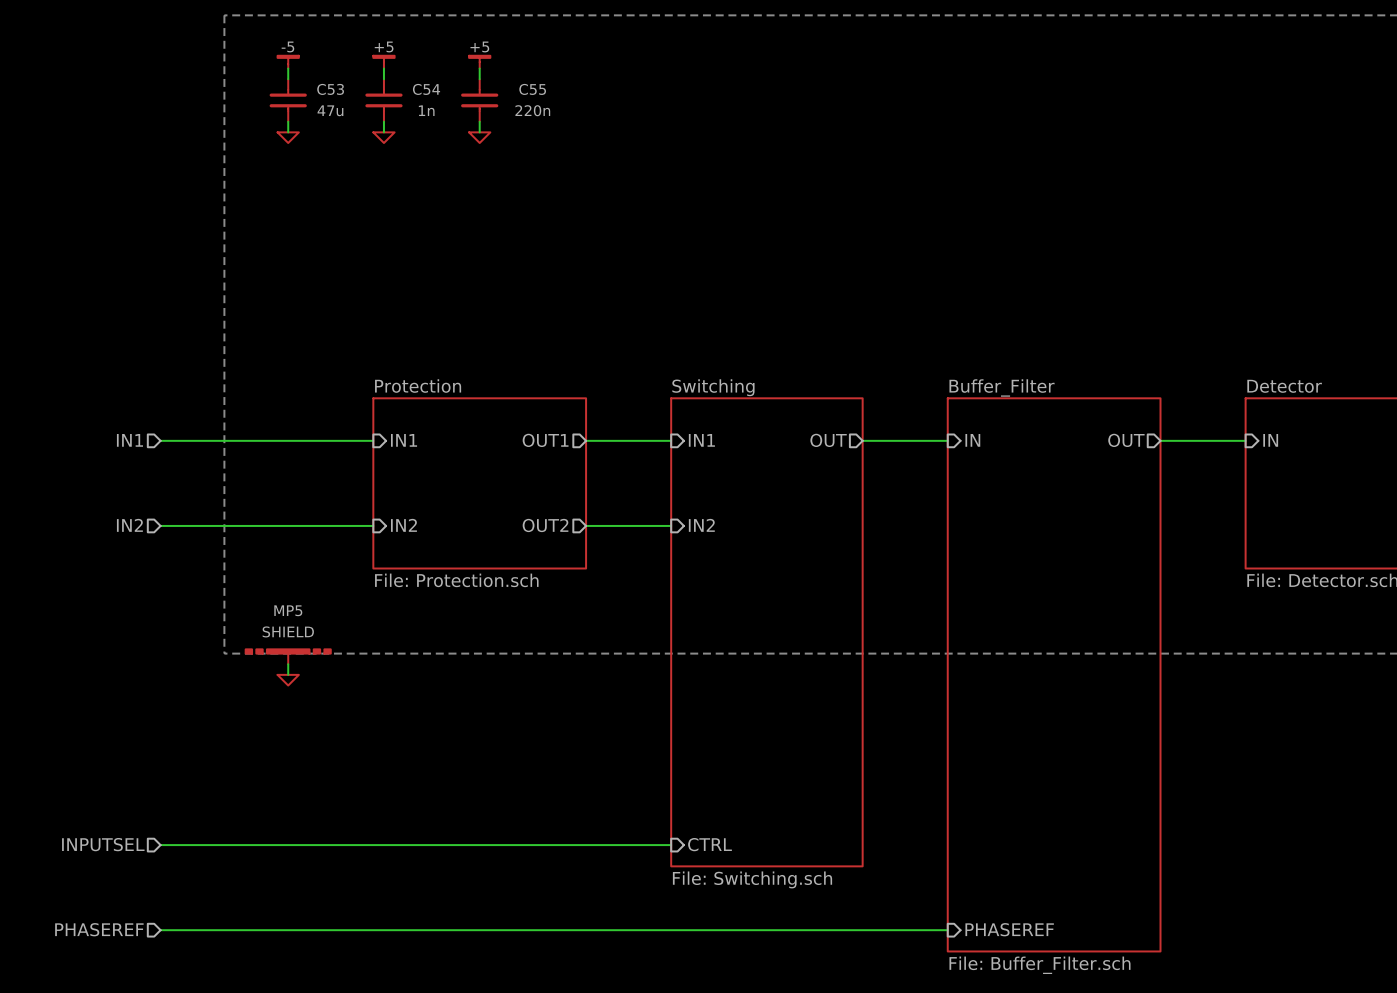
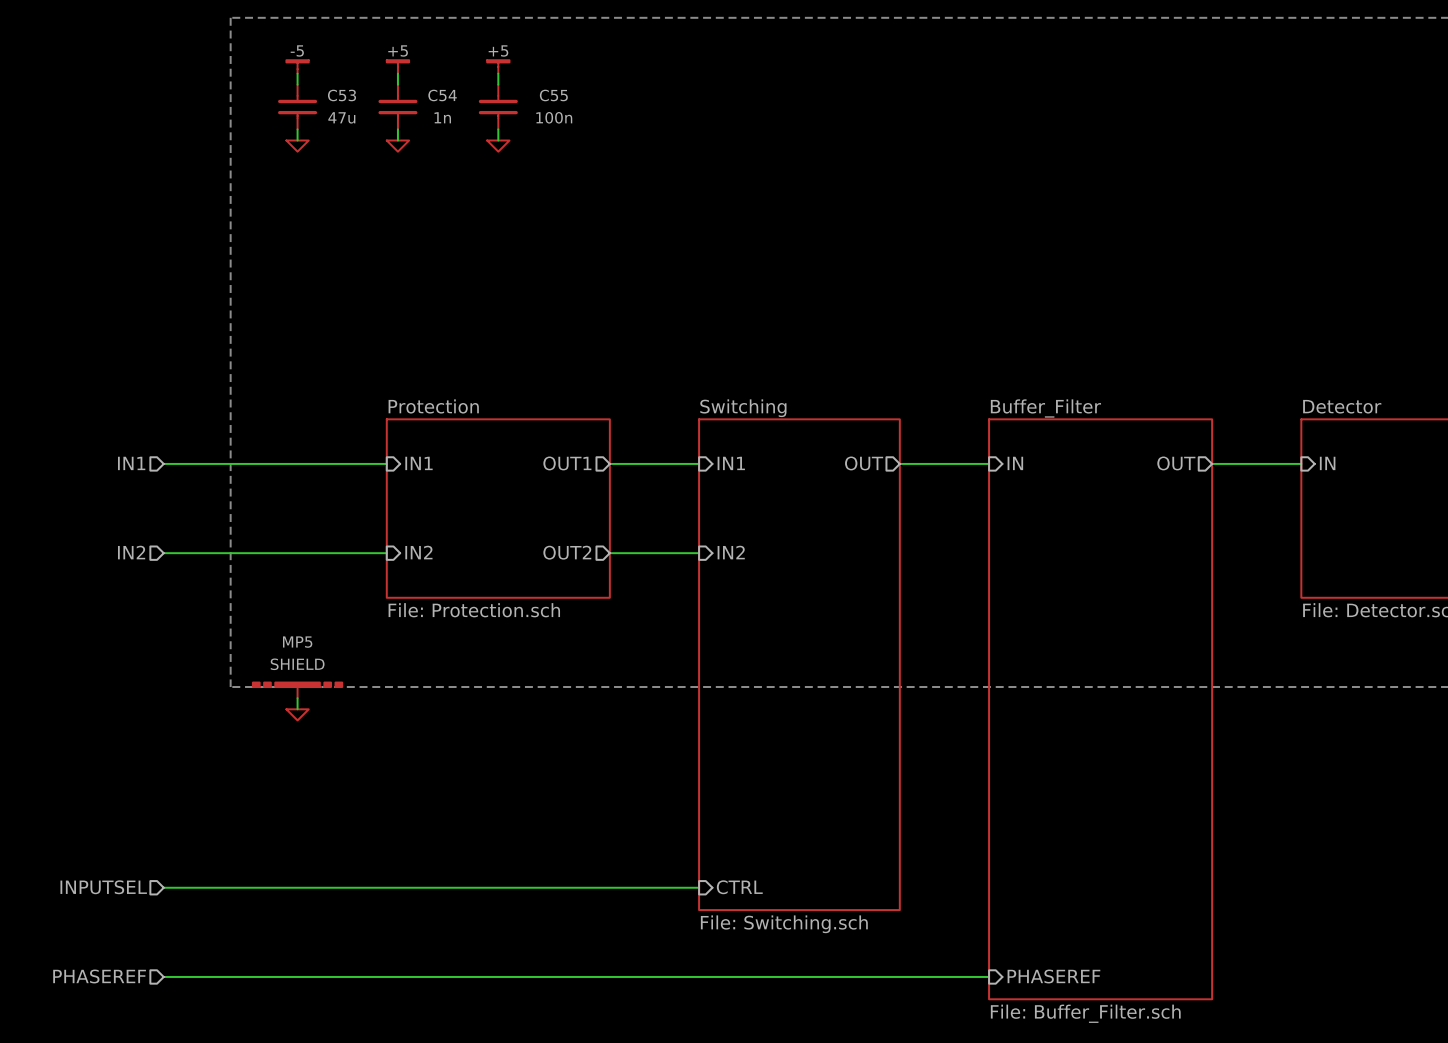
C55 value: 220n (532, 110) -> 100n (554, 117)

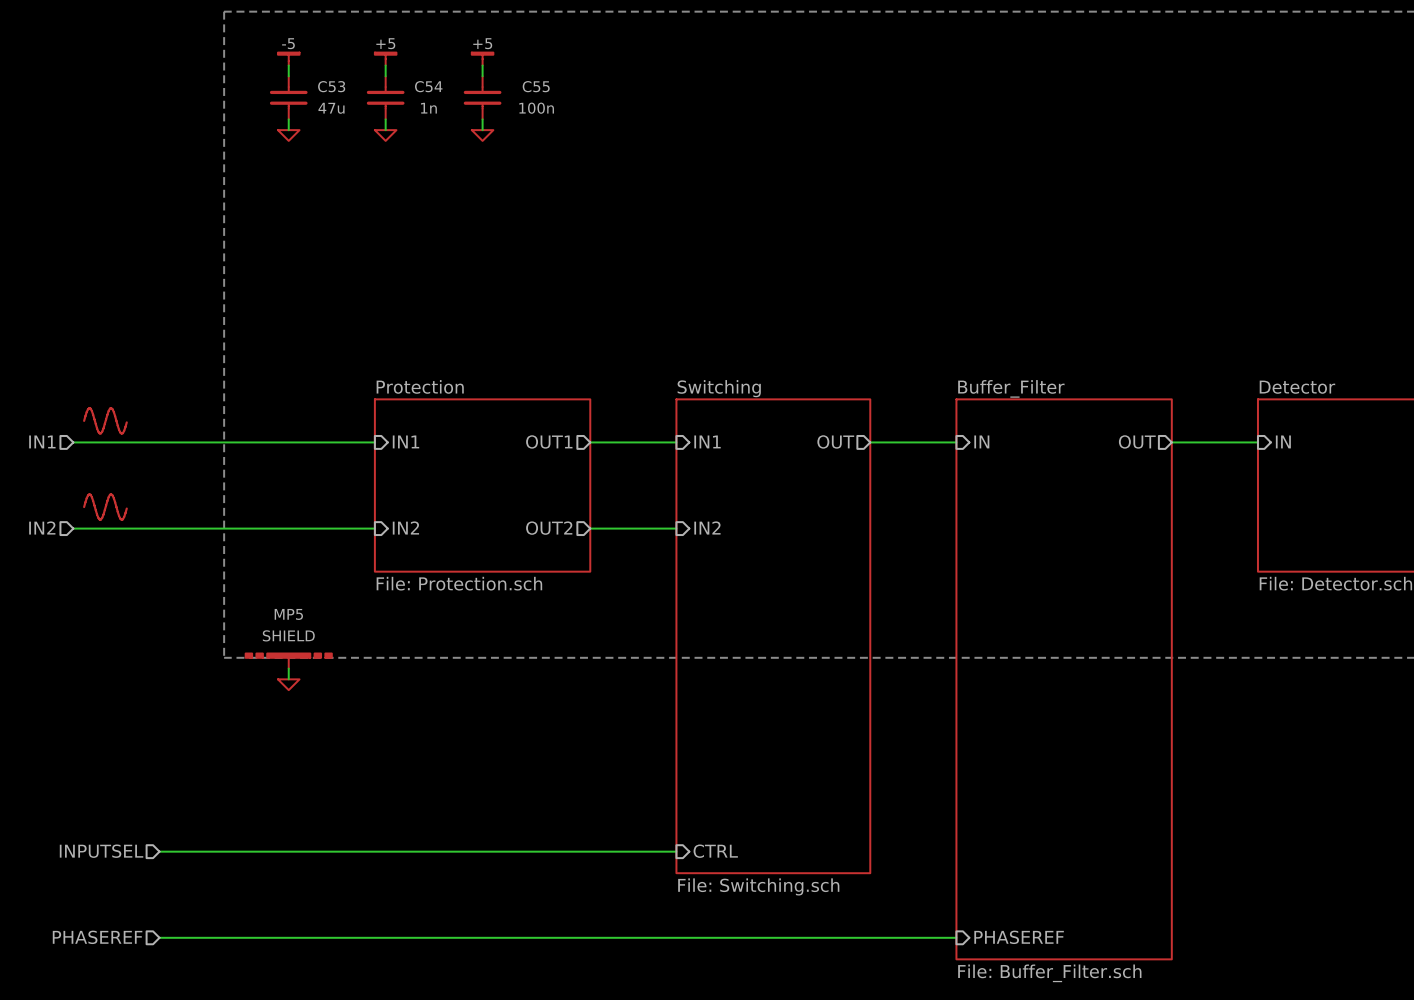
power symbol: none -> (105, 420)
wire: none -> (73, 442) (159, 442)
hierarchical label position: IN1 (131, 463) -> IN1 (42, 441)
power symbol: none -> (105, 507)
hierarchical label position: IN2 (131, 552) -> IN2 (42, 527)
wire: none -> (73, 528) (159, 528)

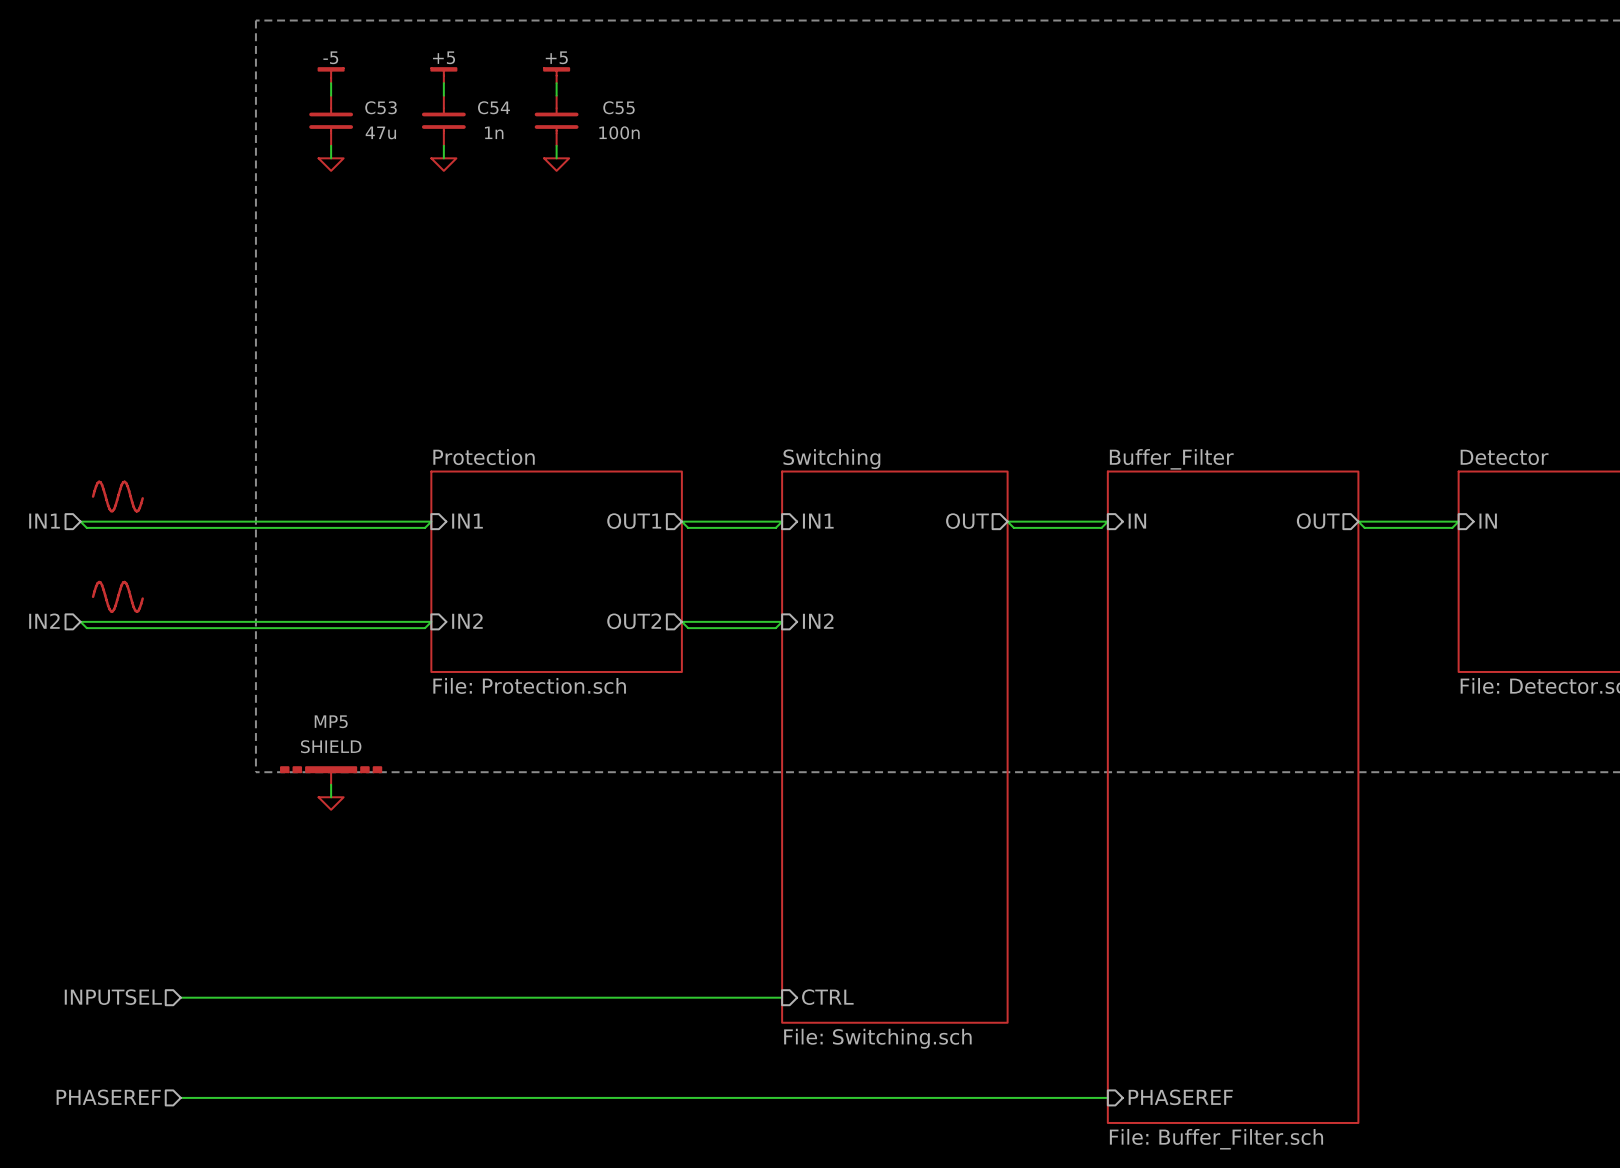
wire: none -> (80, 521) (86, 527) (425, 527) (431, 521)
wire: none -> (681, 521) (688, 527) (775, 527) (782, 521)
wire: none -> (1007, 521) (1013, 527) (1101, 527) (1107, 521)
wire: none -> (1358, 521) (1364, 527) (1452, 527) (1458, 521)
wire: none -> (80, 621) (86, 628) (425, 628) (431, 621)
wire: none -> (681, 621) (688, 628) (775, 628) (782, 621)

